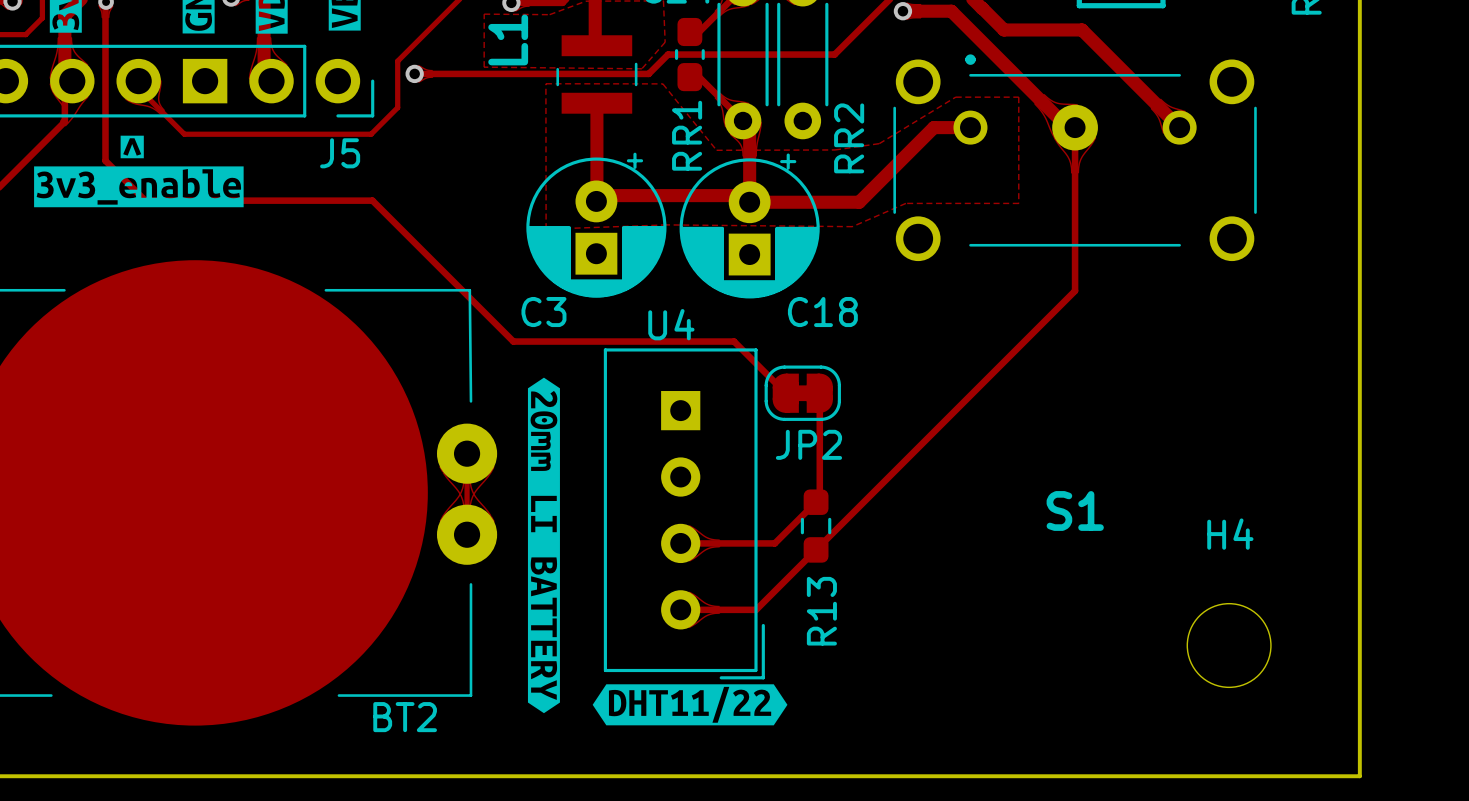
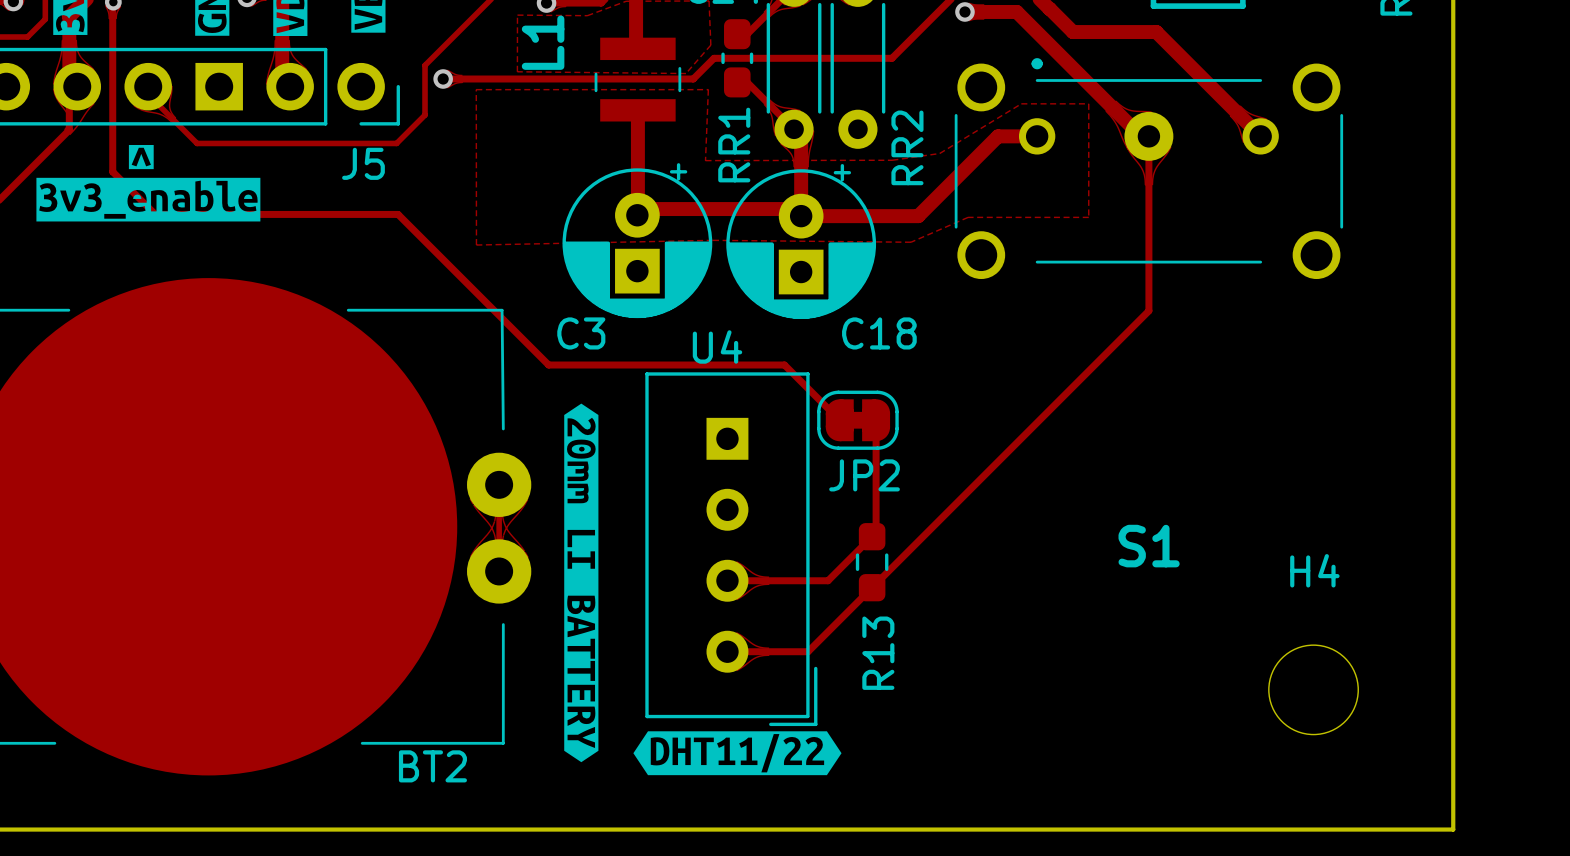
zone outline: (835, 149) (716, 150) (662, 83) (545, 83) (546, 229) (666, 224) -> (892, 160) (705, 160) (708, 89) (476, 89) (476, 245) (712, 240)

